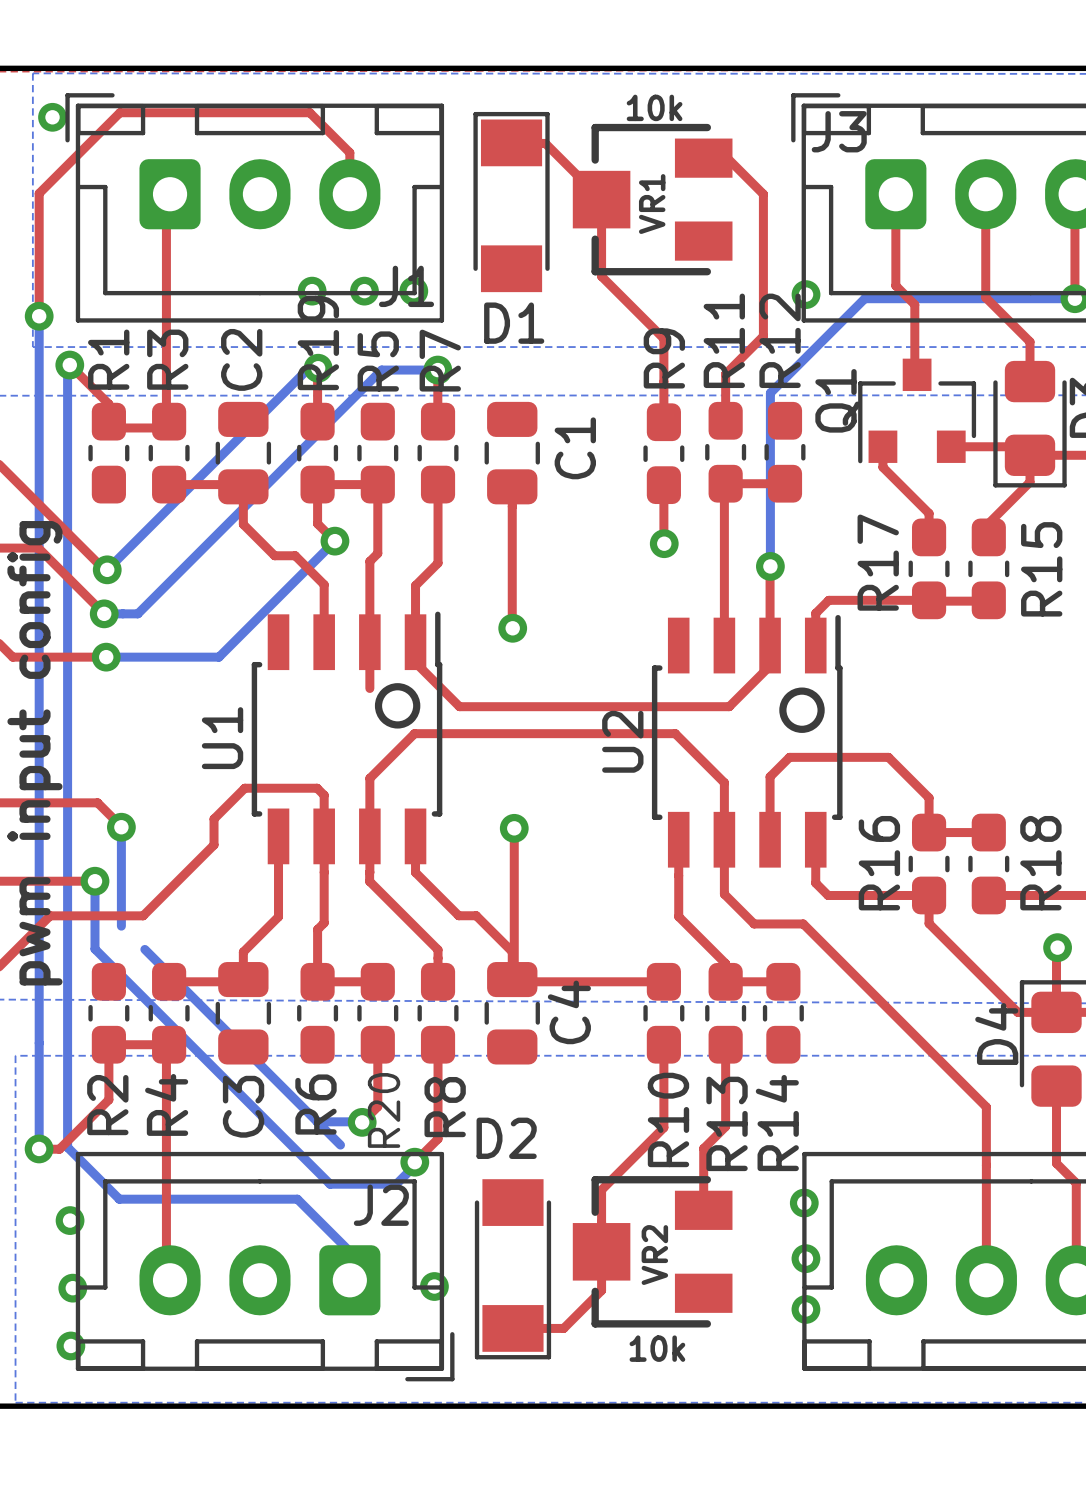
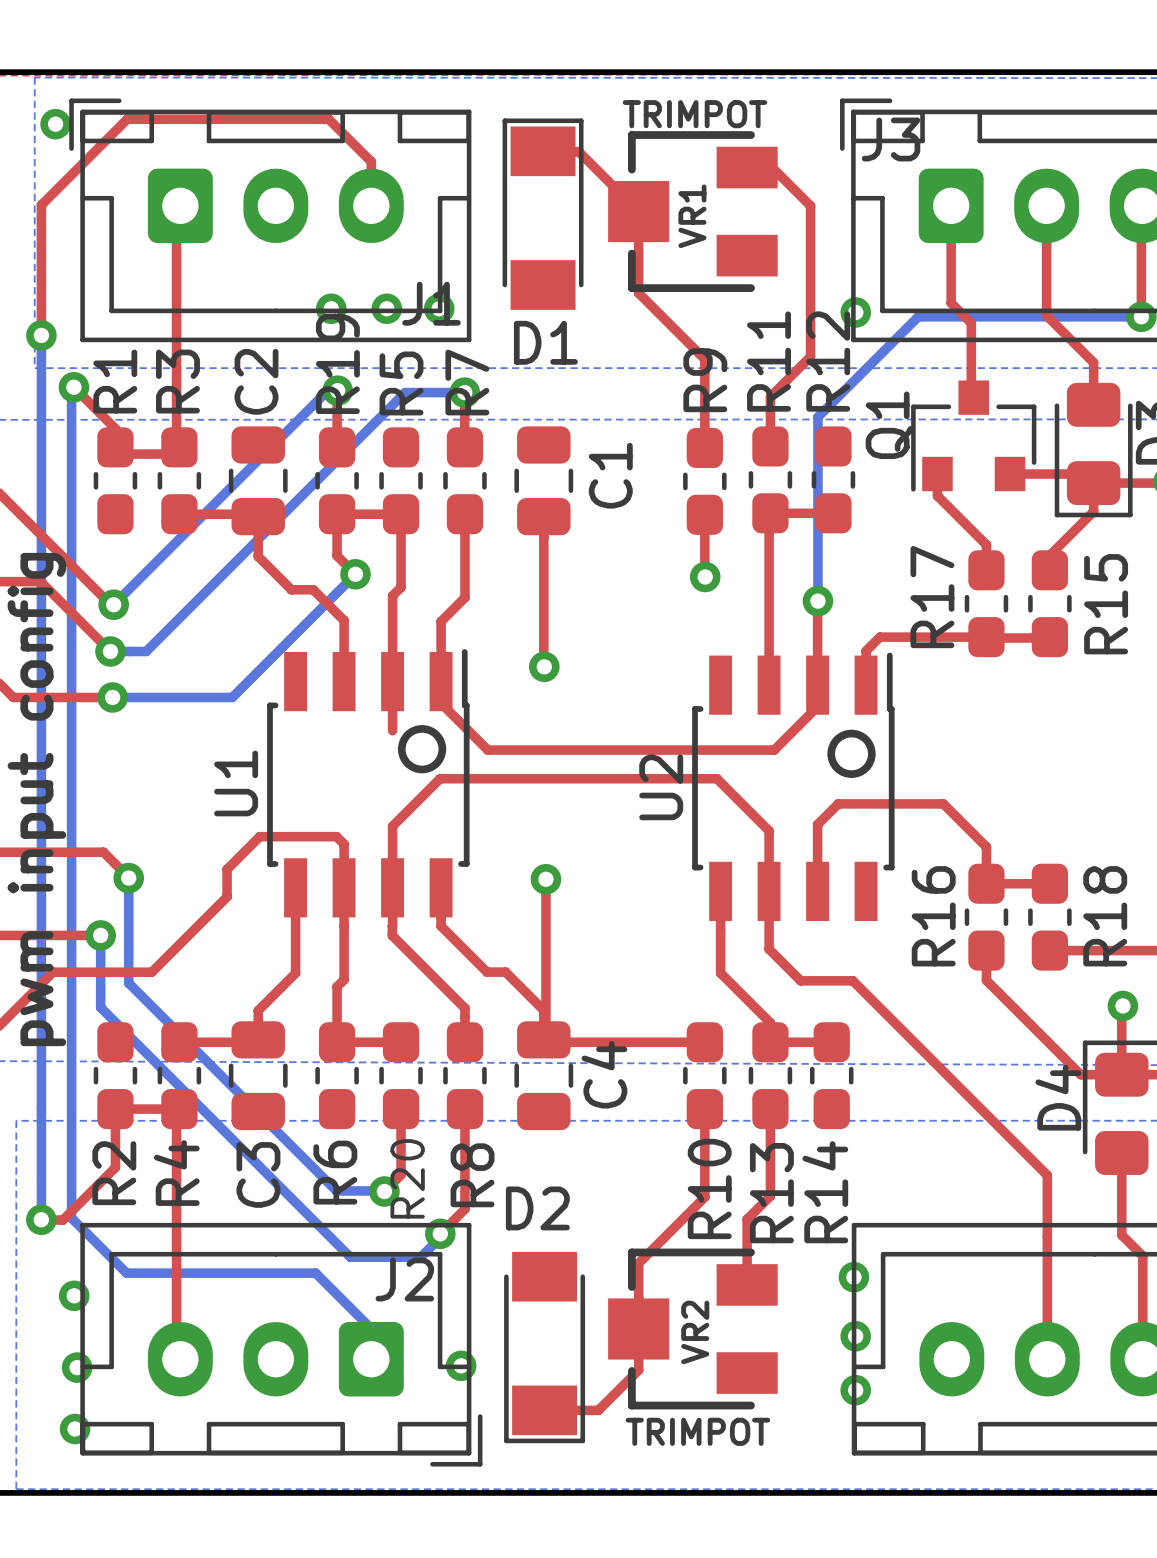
VR1 value: 10k (654, 107) -> TRIMPOT (694, 114)
top track: (815, 839) (815, 883) (828, 895) (929, 895) -> none
bottom track: (144, 949) (340, 1145) -> (128, 983) (336, 1190)
VR2 value: 10k (657, 1348) -> TRIMPOT (697, 1431)

